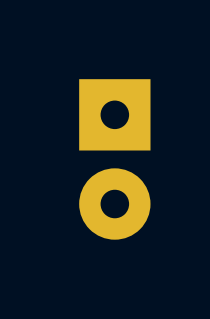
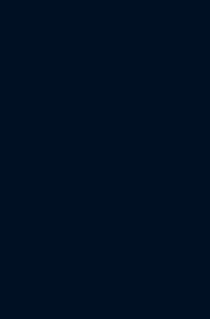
part: (114, 159) -> none

